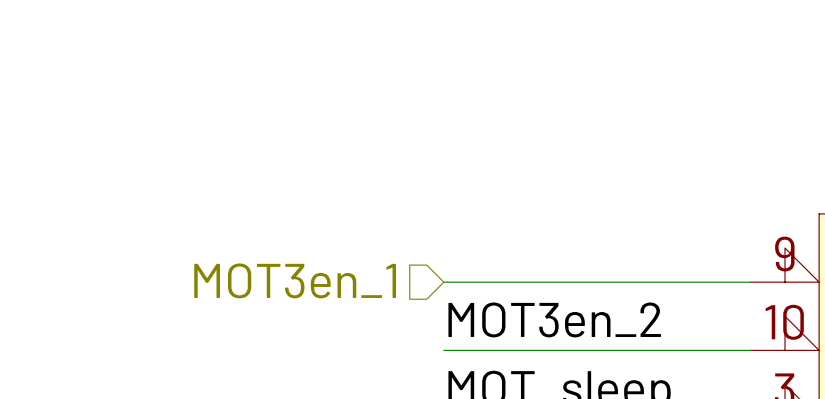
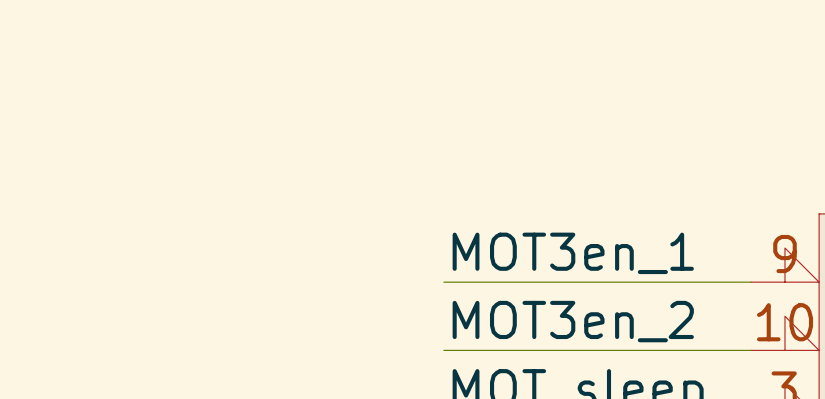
label: none -> MOT3en_1 (573, 253)
hierarchical label: MOT3en_1 (295, 280) -> none

